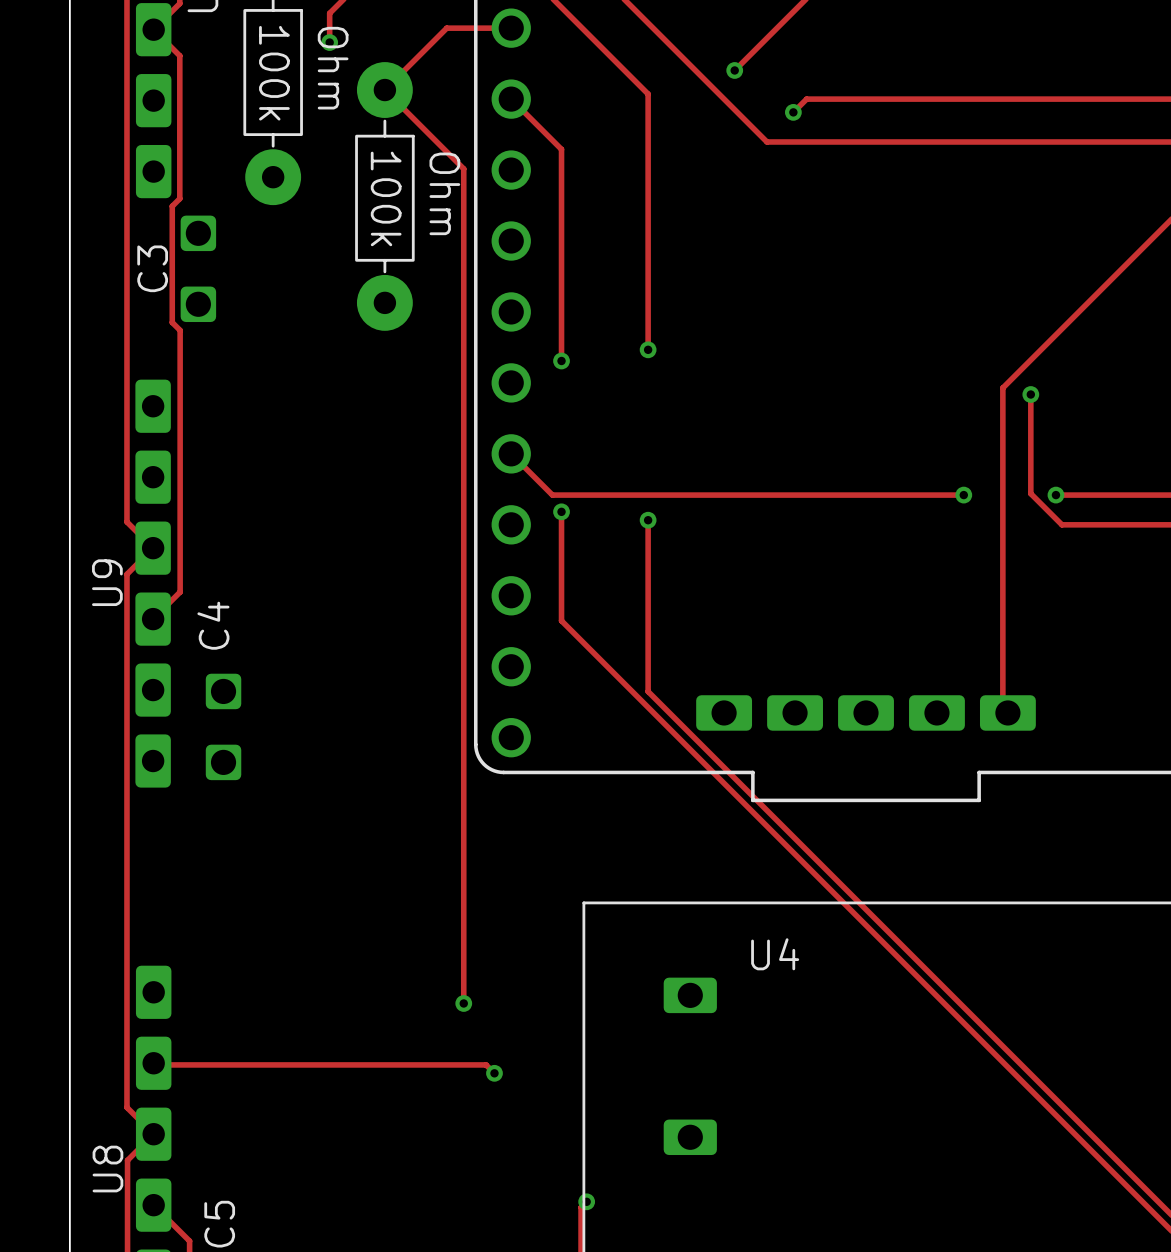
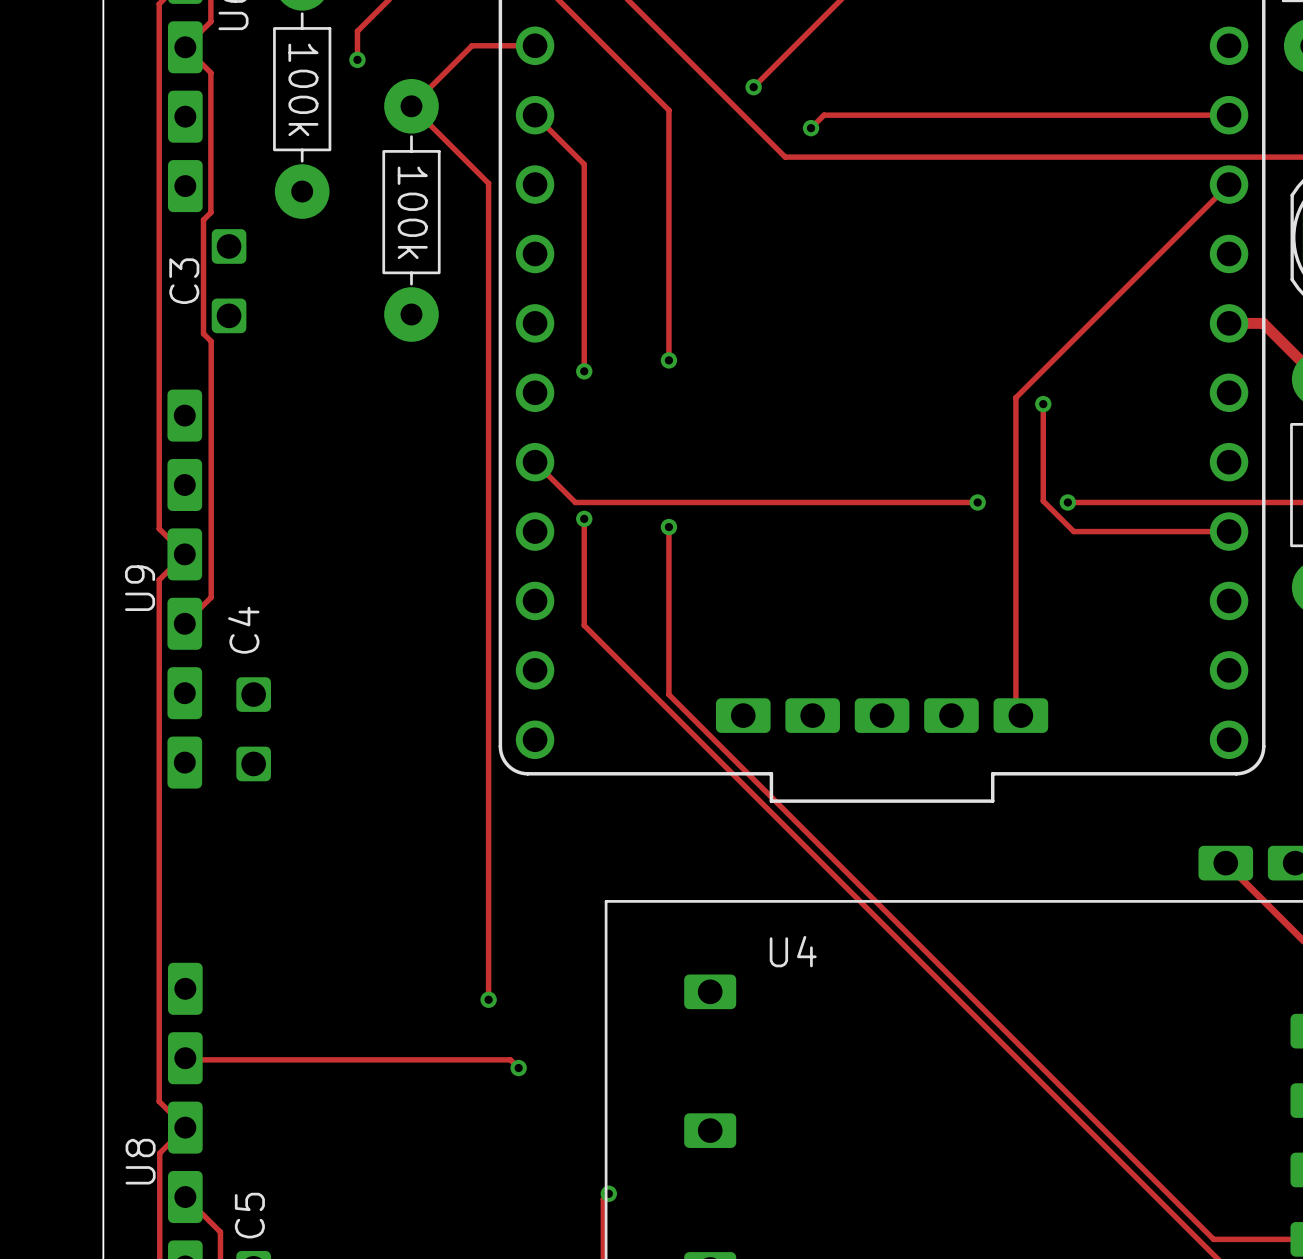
part text: Ohm (333, 68) -> none
part text: Ohm (444, 193) -> none

